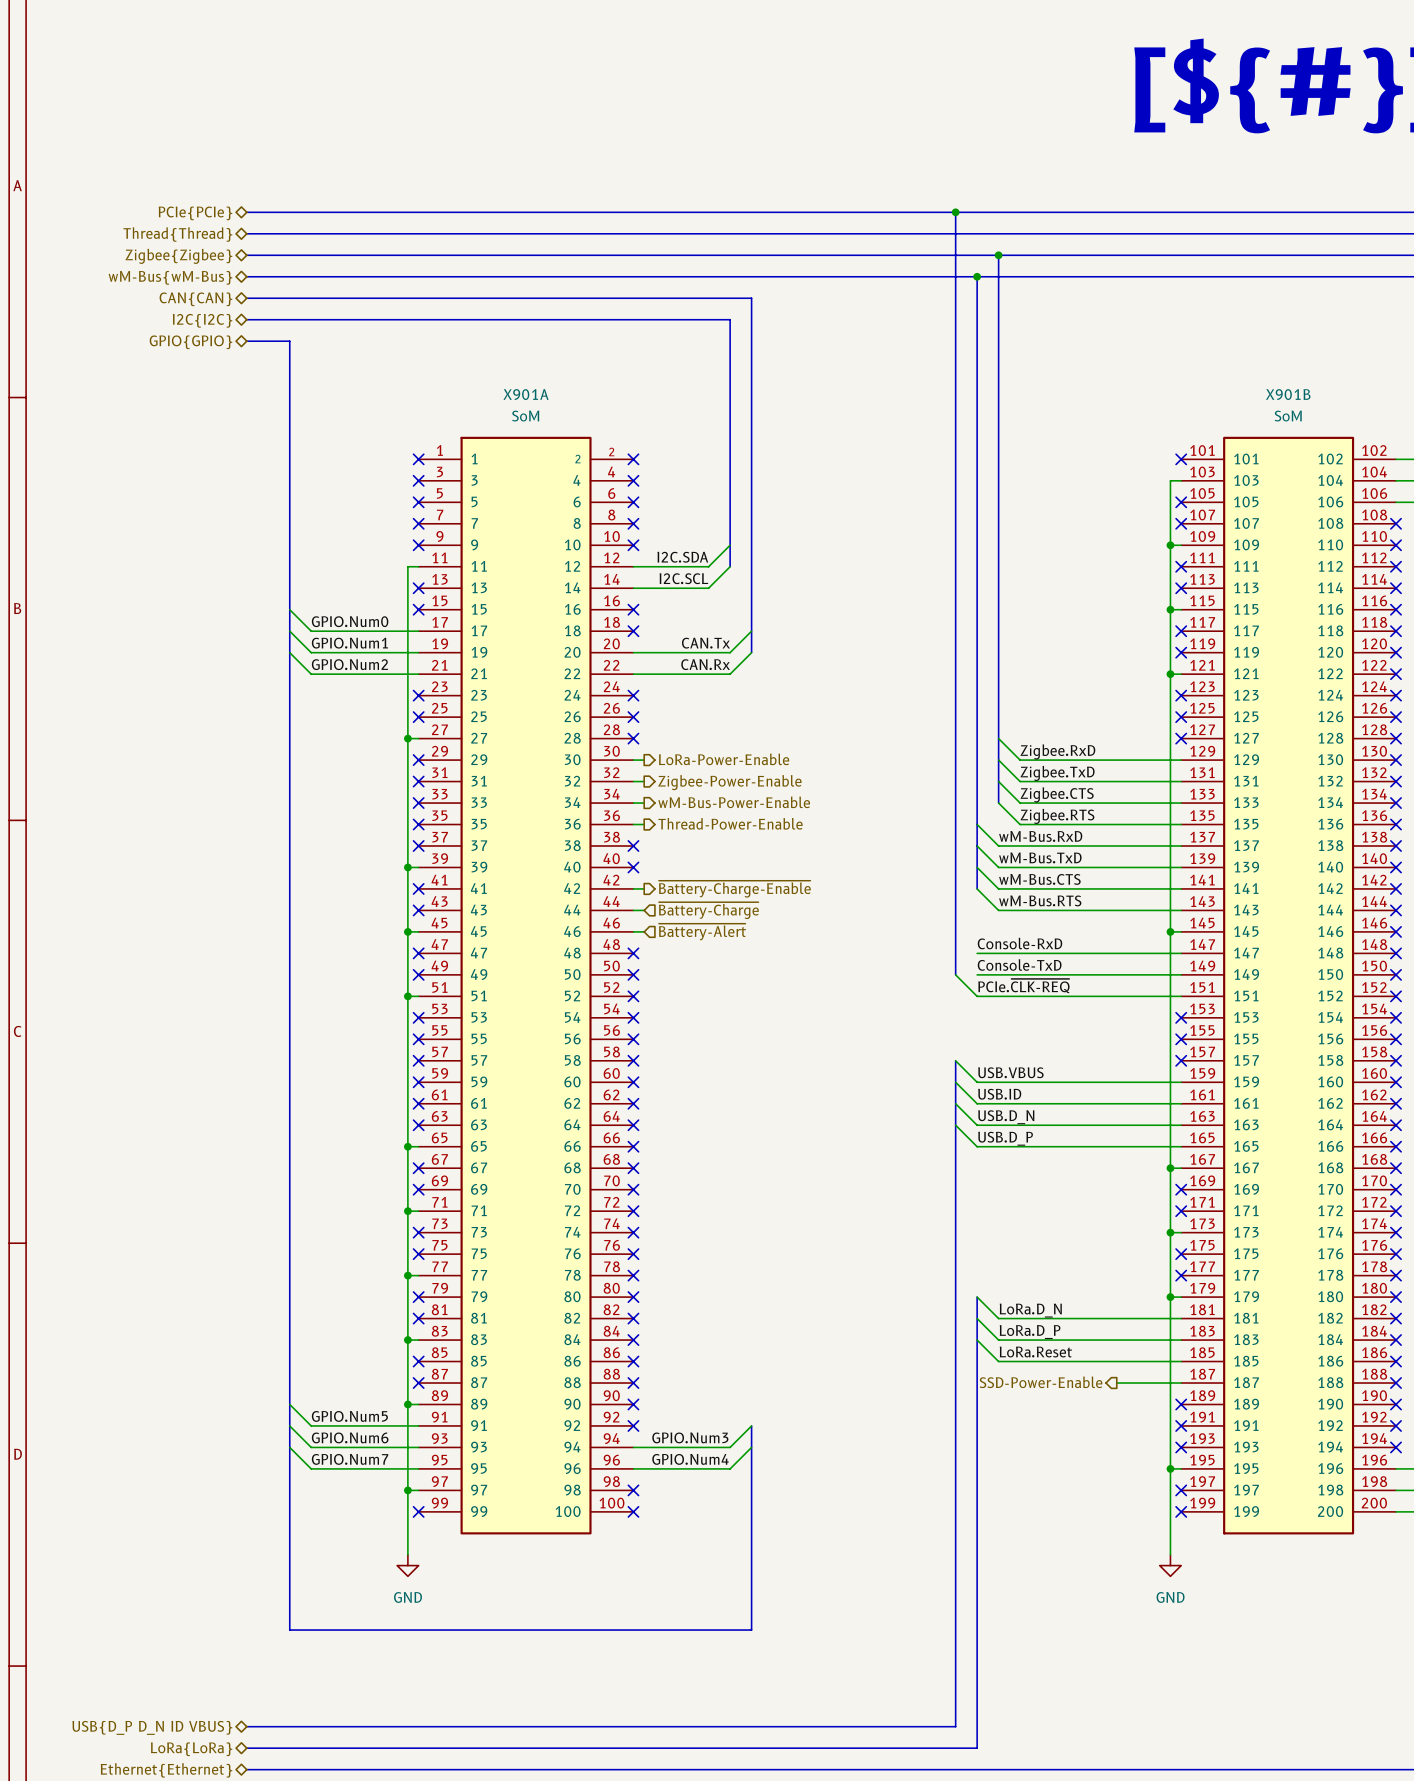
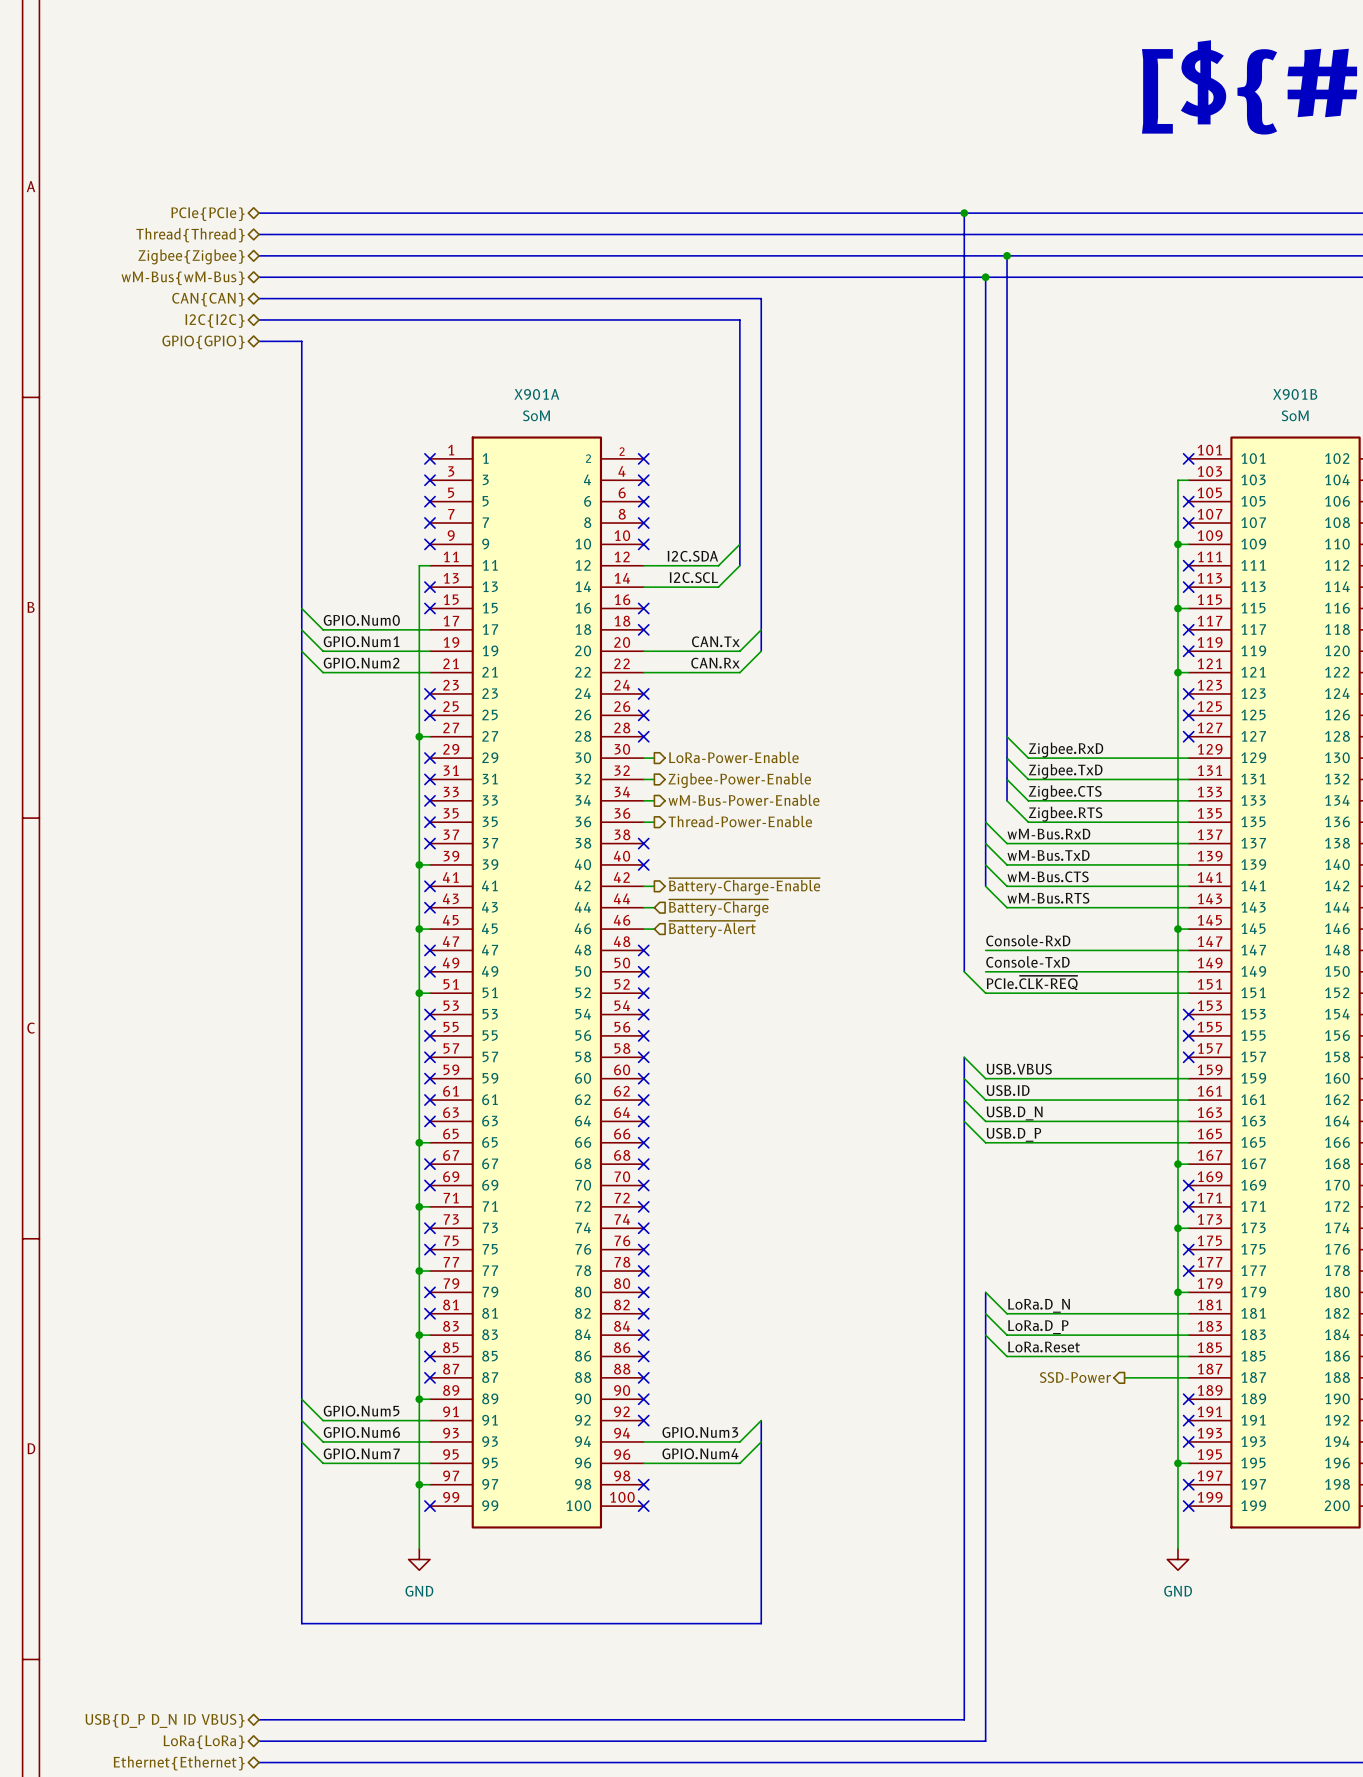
hierarchical label: SSD-Power-Enable (1041, 1382) -> SSD-Power (1075, 1377)

